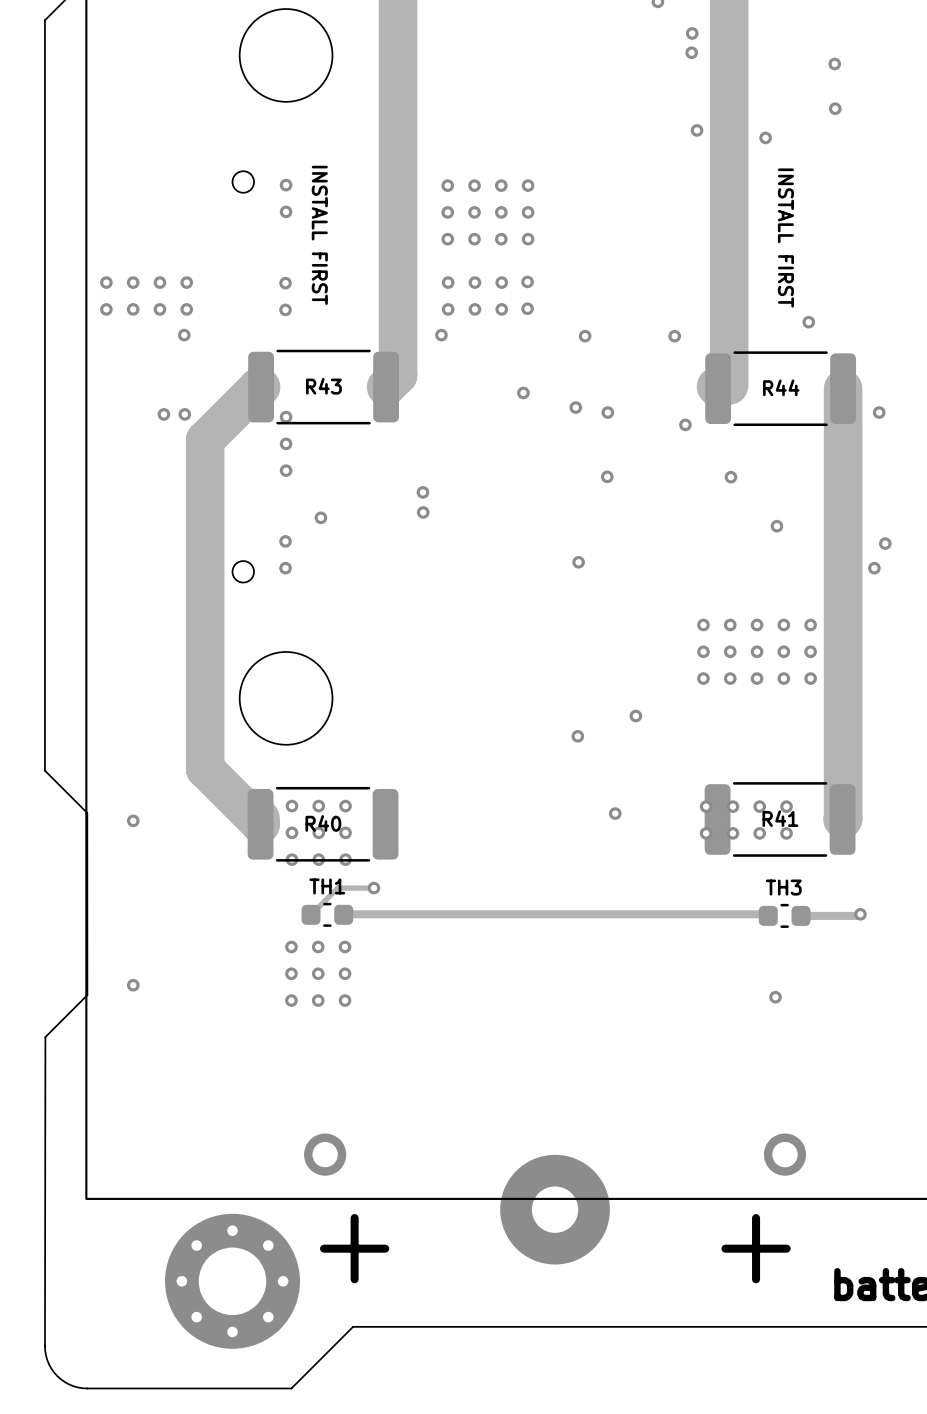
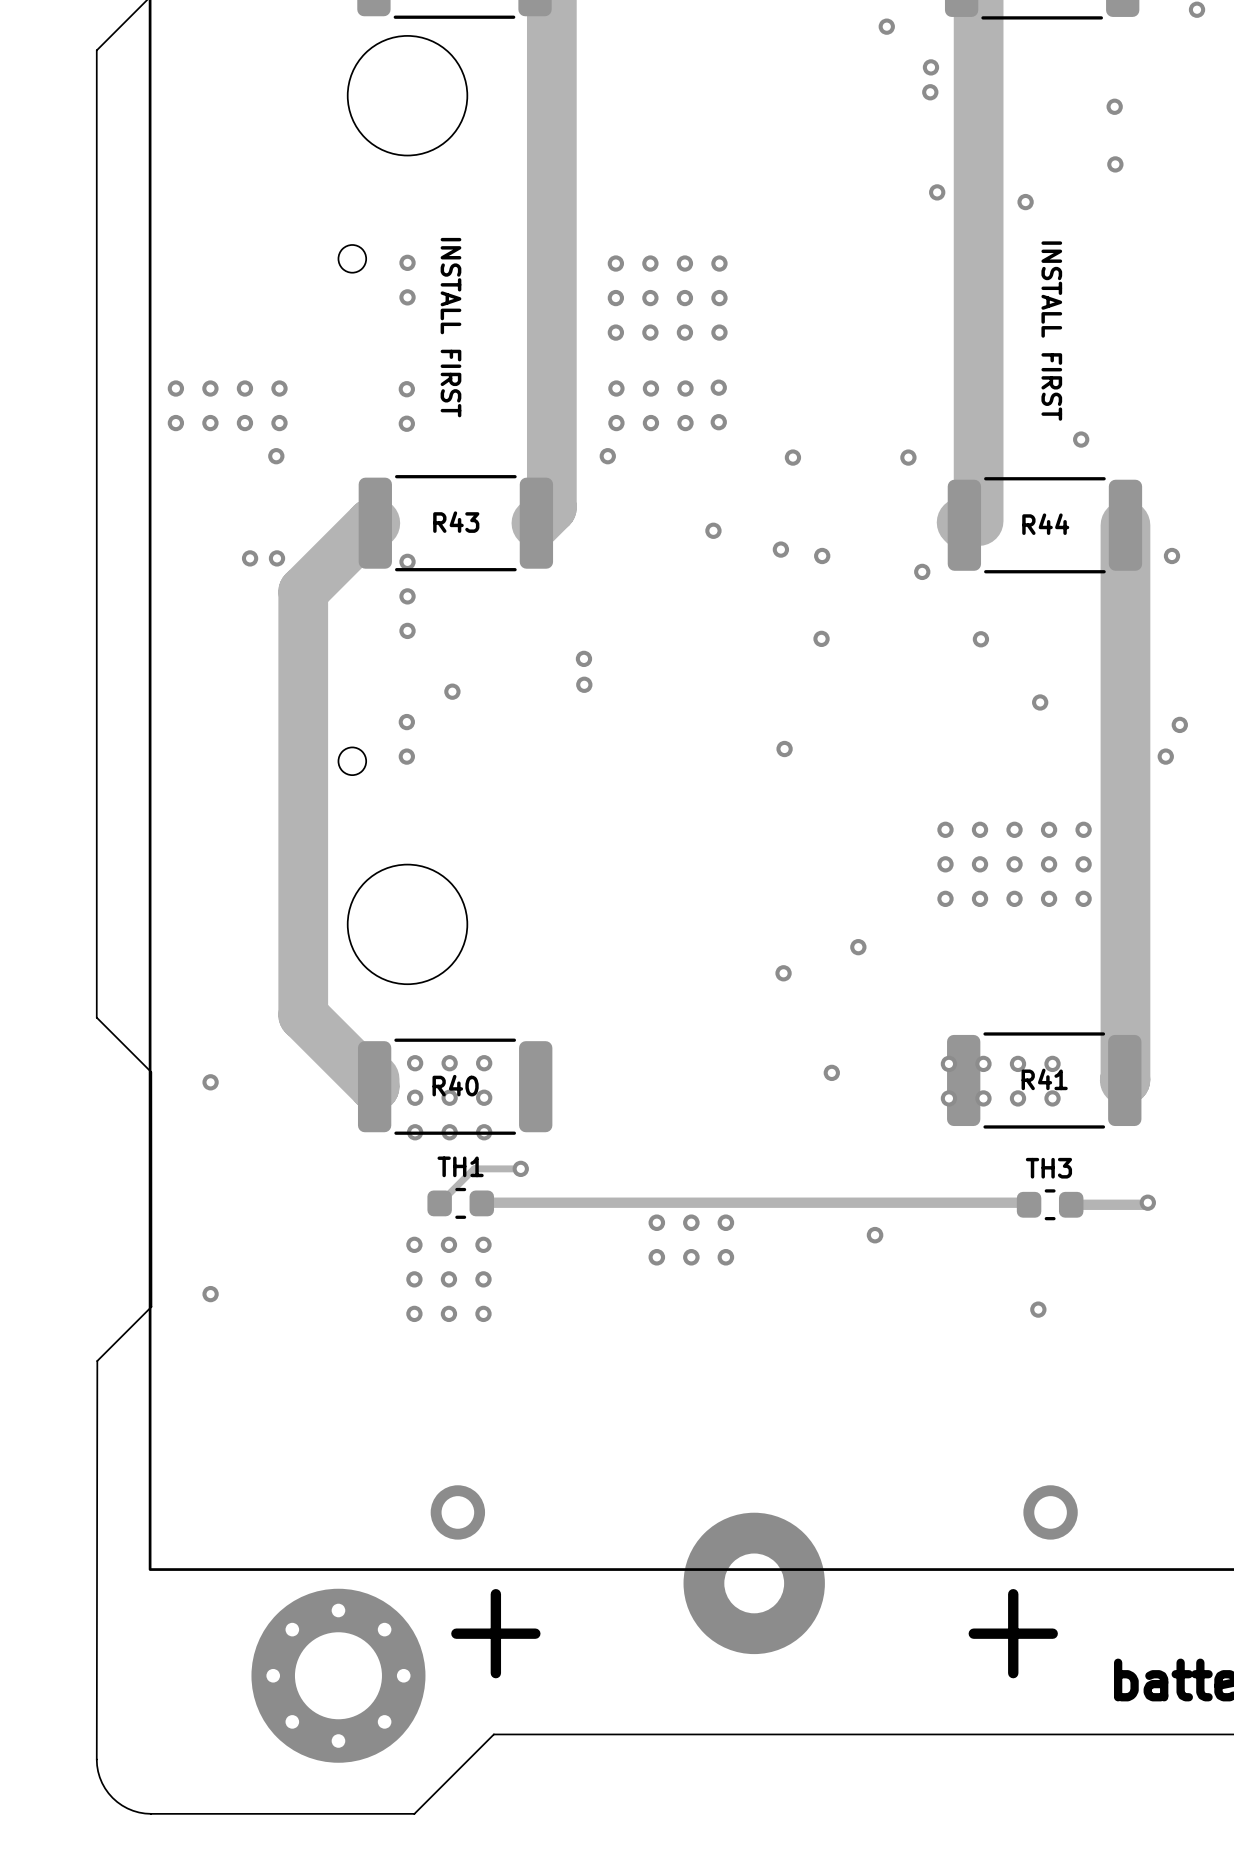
via: none -> (656, 1222)
via: none -> (691, 1222)
via: none -> (725, 1222)
via: none -> (875, 1235)
via: none -> (656, 1257)
via: none -> (691, 1257)
via: none -> (725, 1257)

